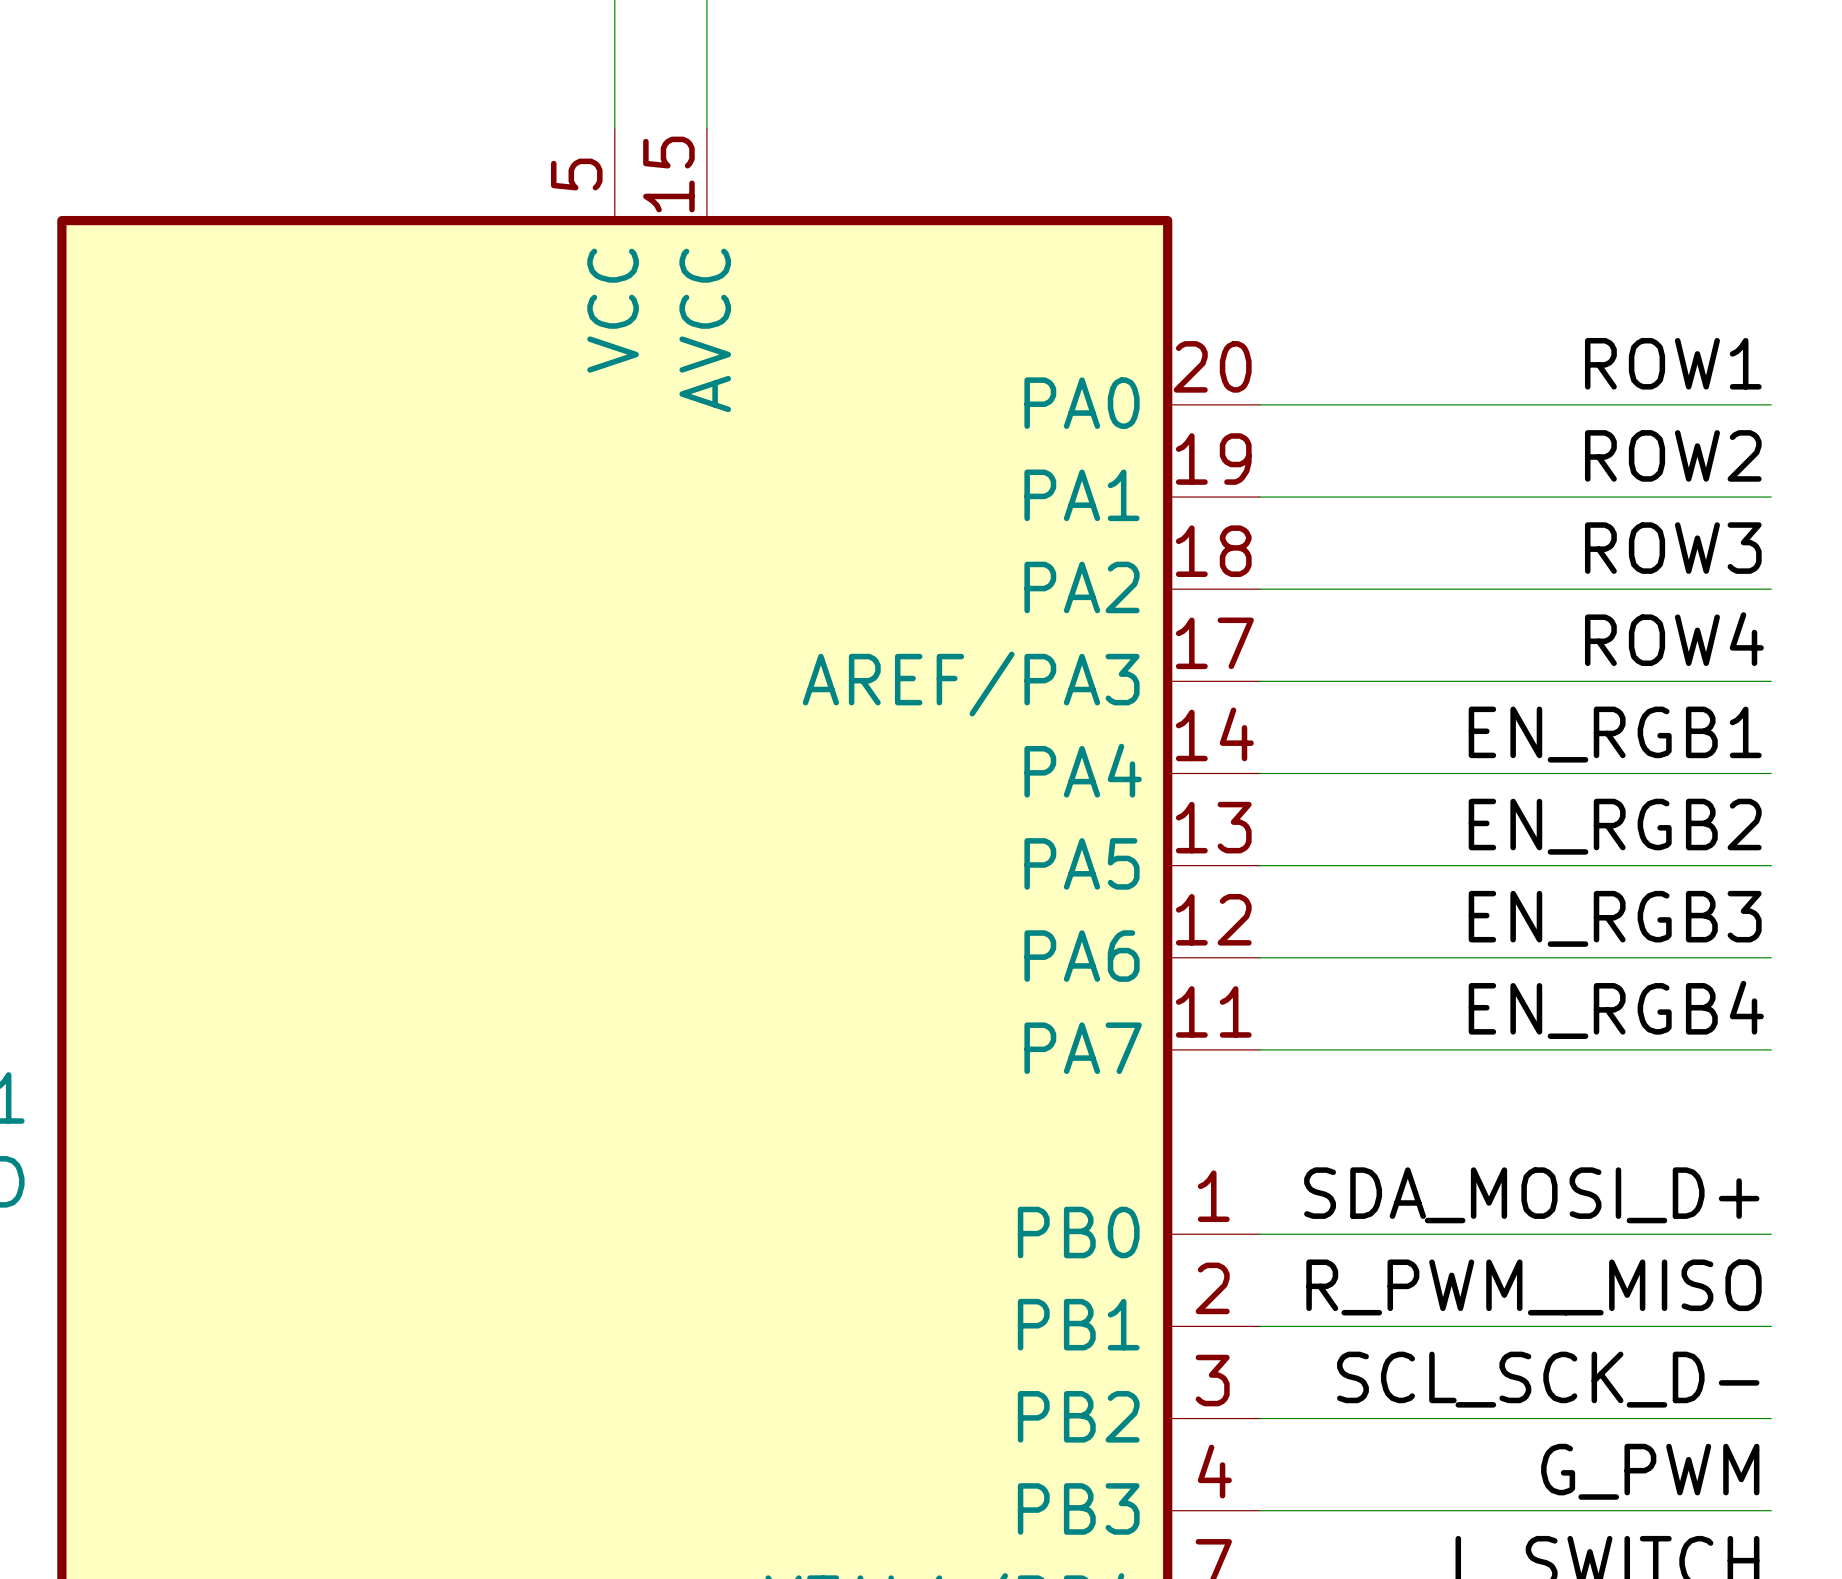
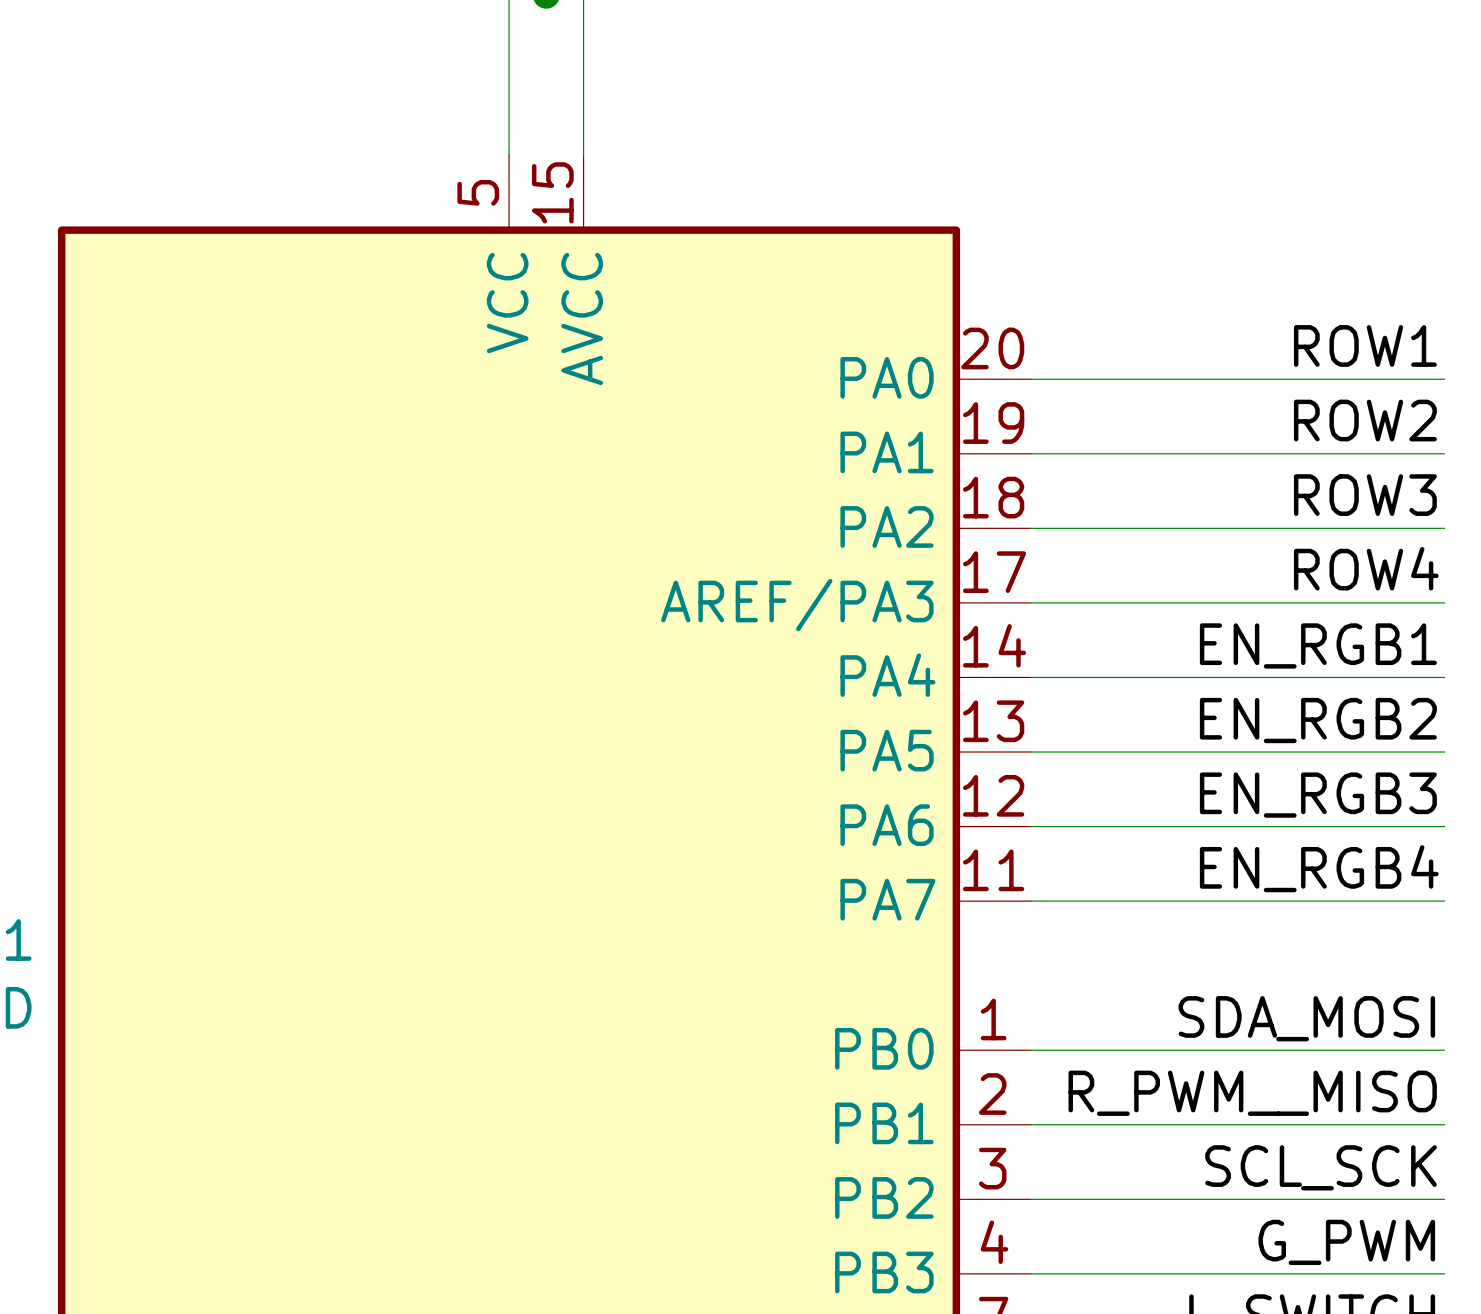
label: SDA_MOSI_D+ (1531, 1195) -> SDA_MOSI (1306, 1018)
label: SCL_SCK_D- (1548, 1379) -> SCL_SCK (1321, 1167)

